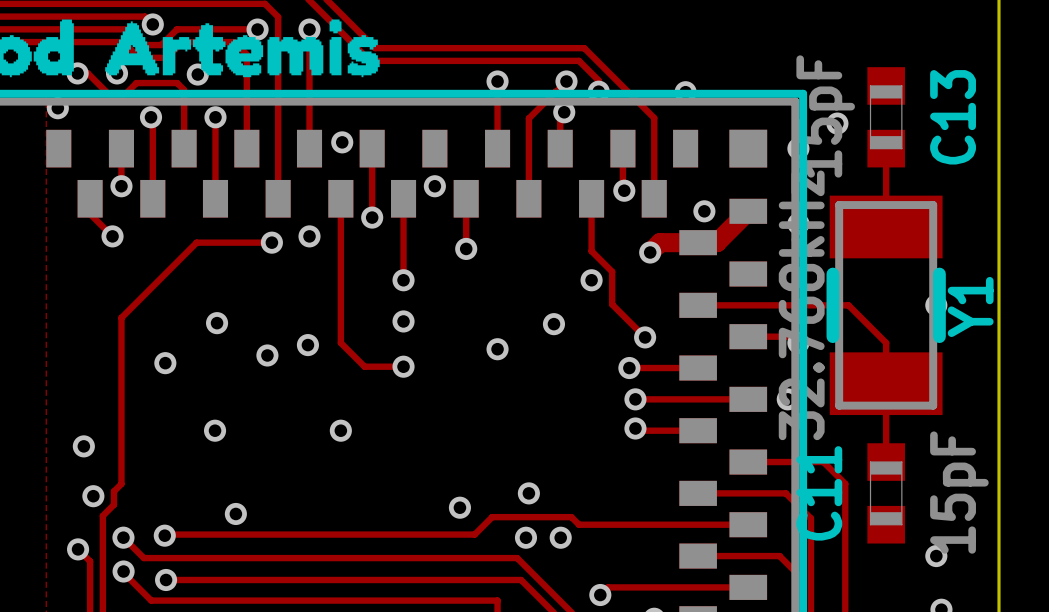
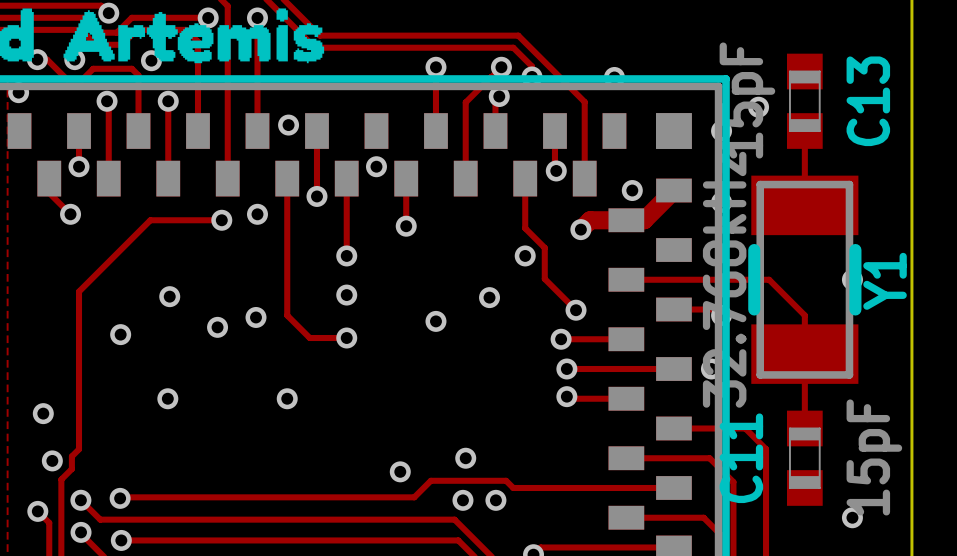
via: (235, 513) -> none

